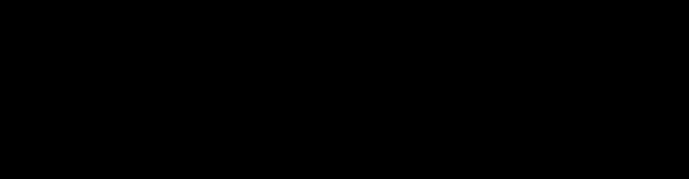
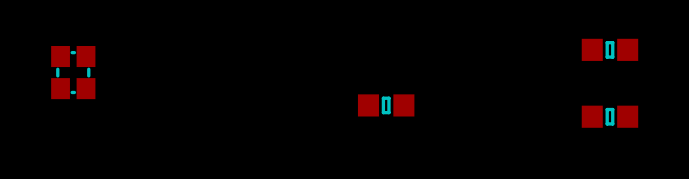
part: none -> (609, 49)
part: none -> (73, 72)
part: none -> (386, 105)
part: none -> (609, 116)

